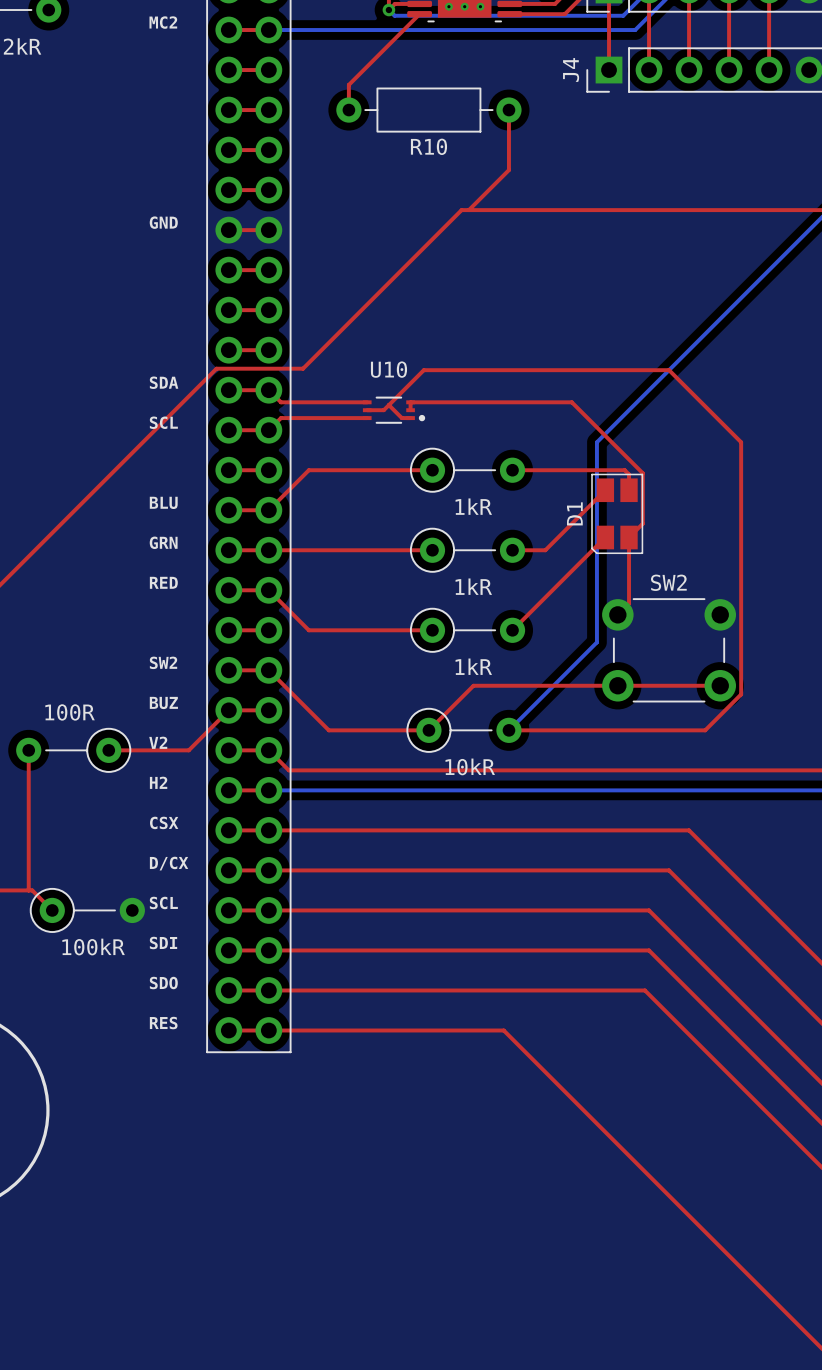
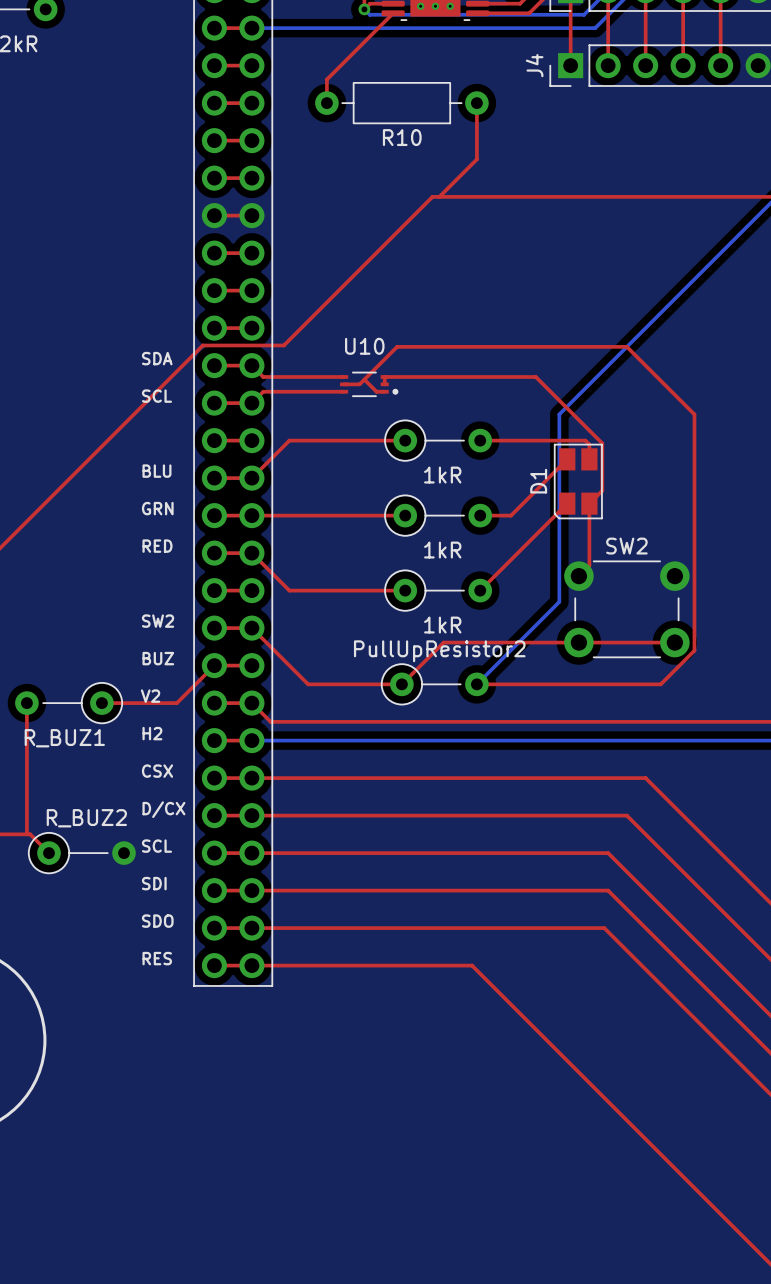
text: MC2 (163, 22) -> none
text: GND (163, 222) -> none
PullUpResistor2 name: none -> PullUpResistor2 (439, 651)
R_BUZ1 value: 100R (70, 712) -> none
PullUpResistor2 value: 10kR (470, 766) -> none
R_BUZ1 name: none -> R_BUZ1 (64, 738)
R_BUZ2 name: none -> R_BUZ2 (86, 818)
R_BUZ2 value: 100kR (93, 947) -> none

